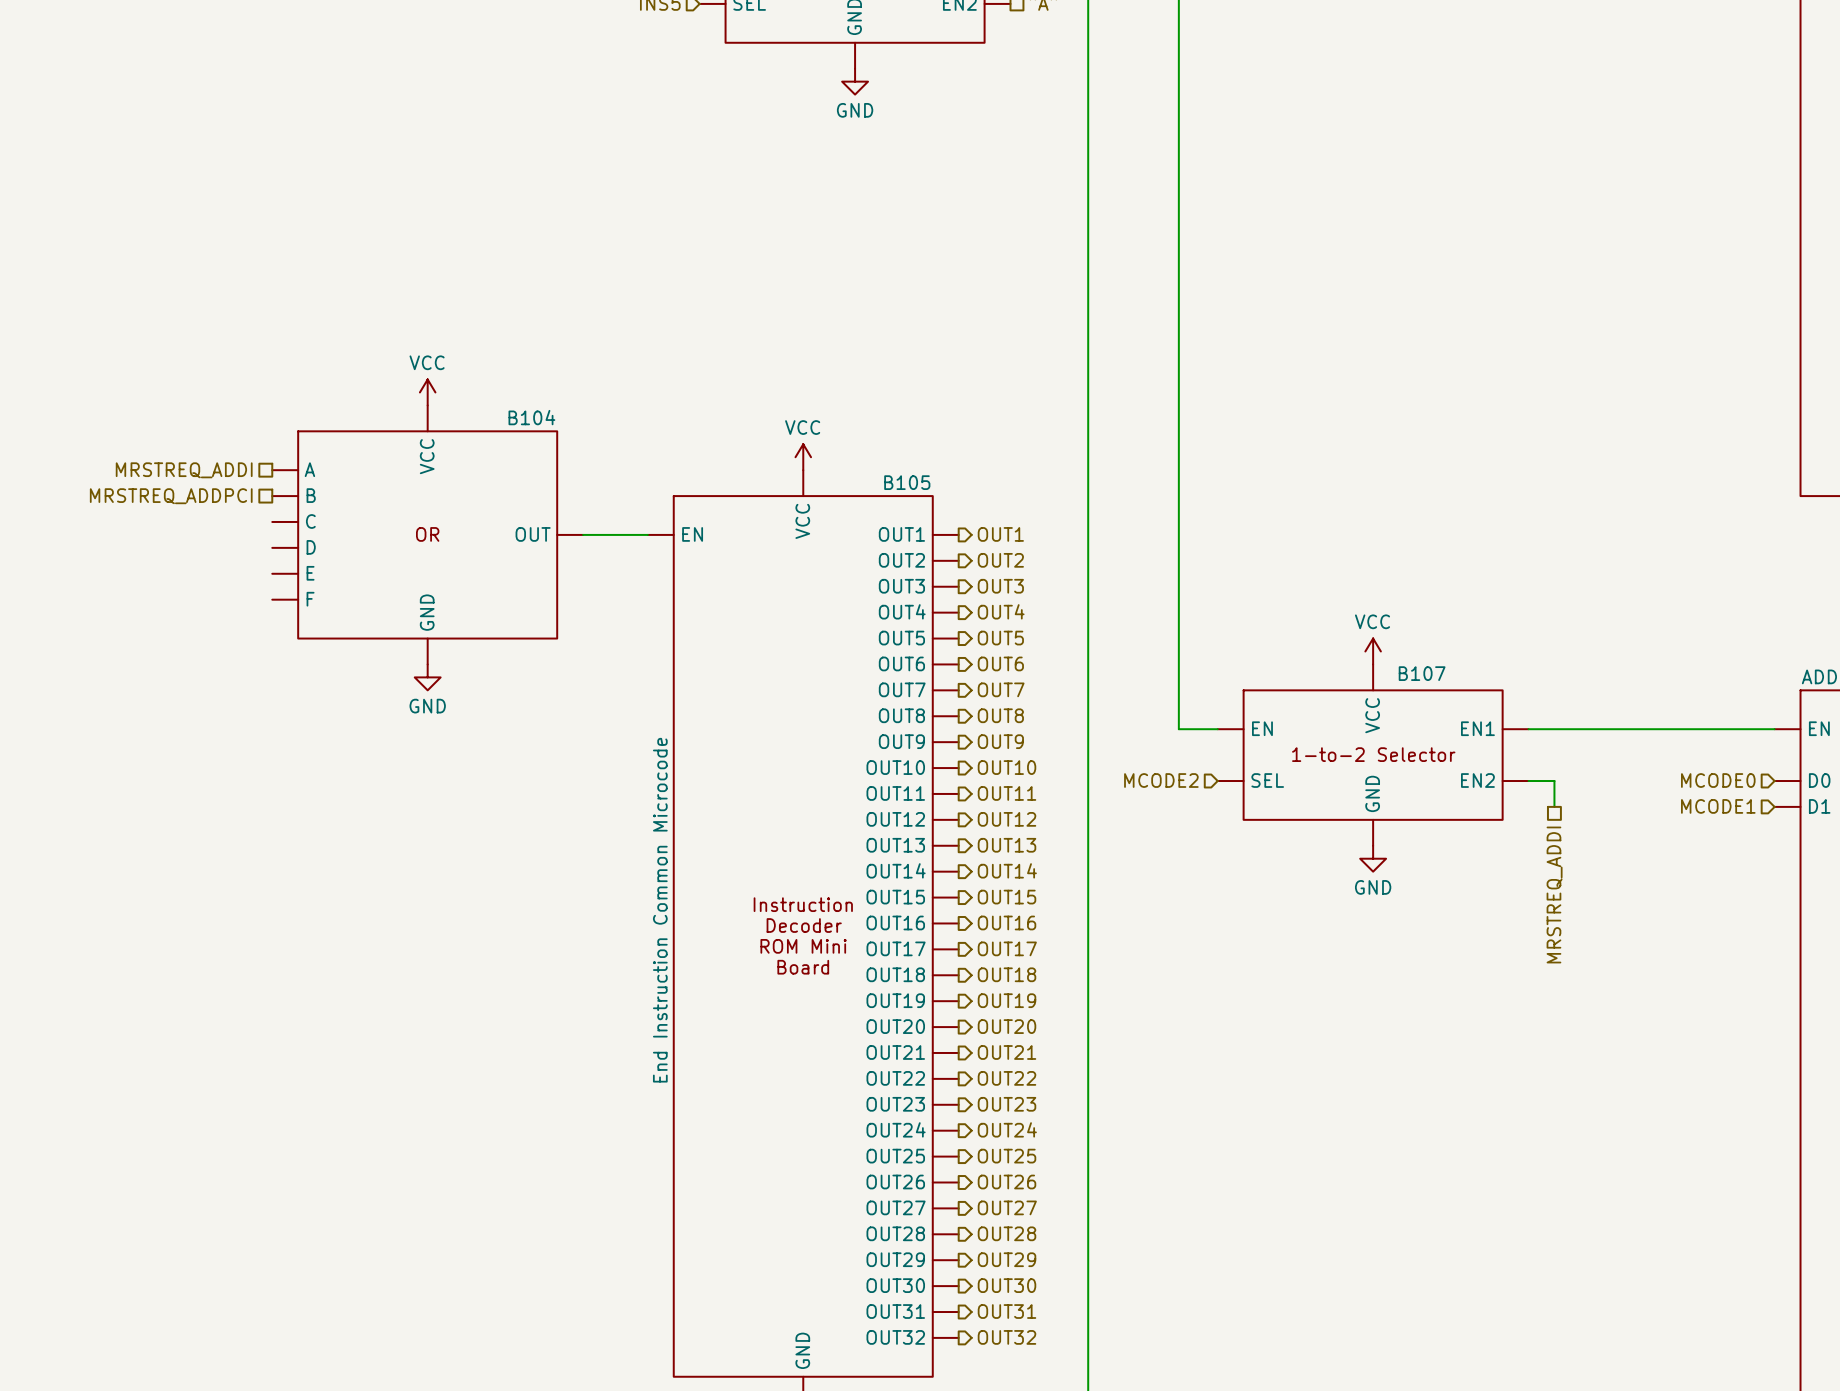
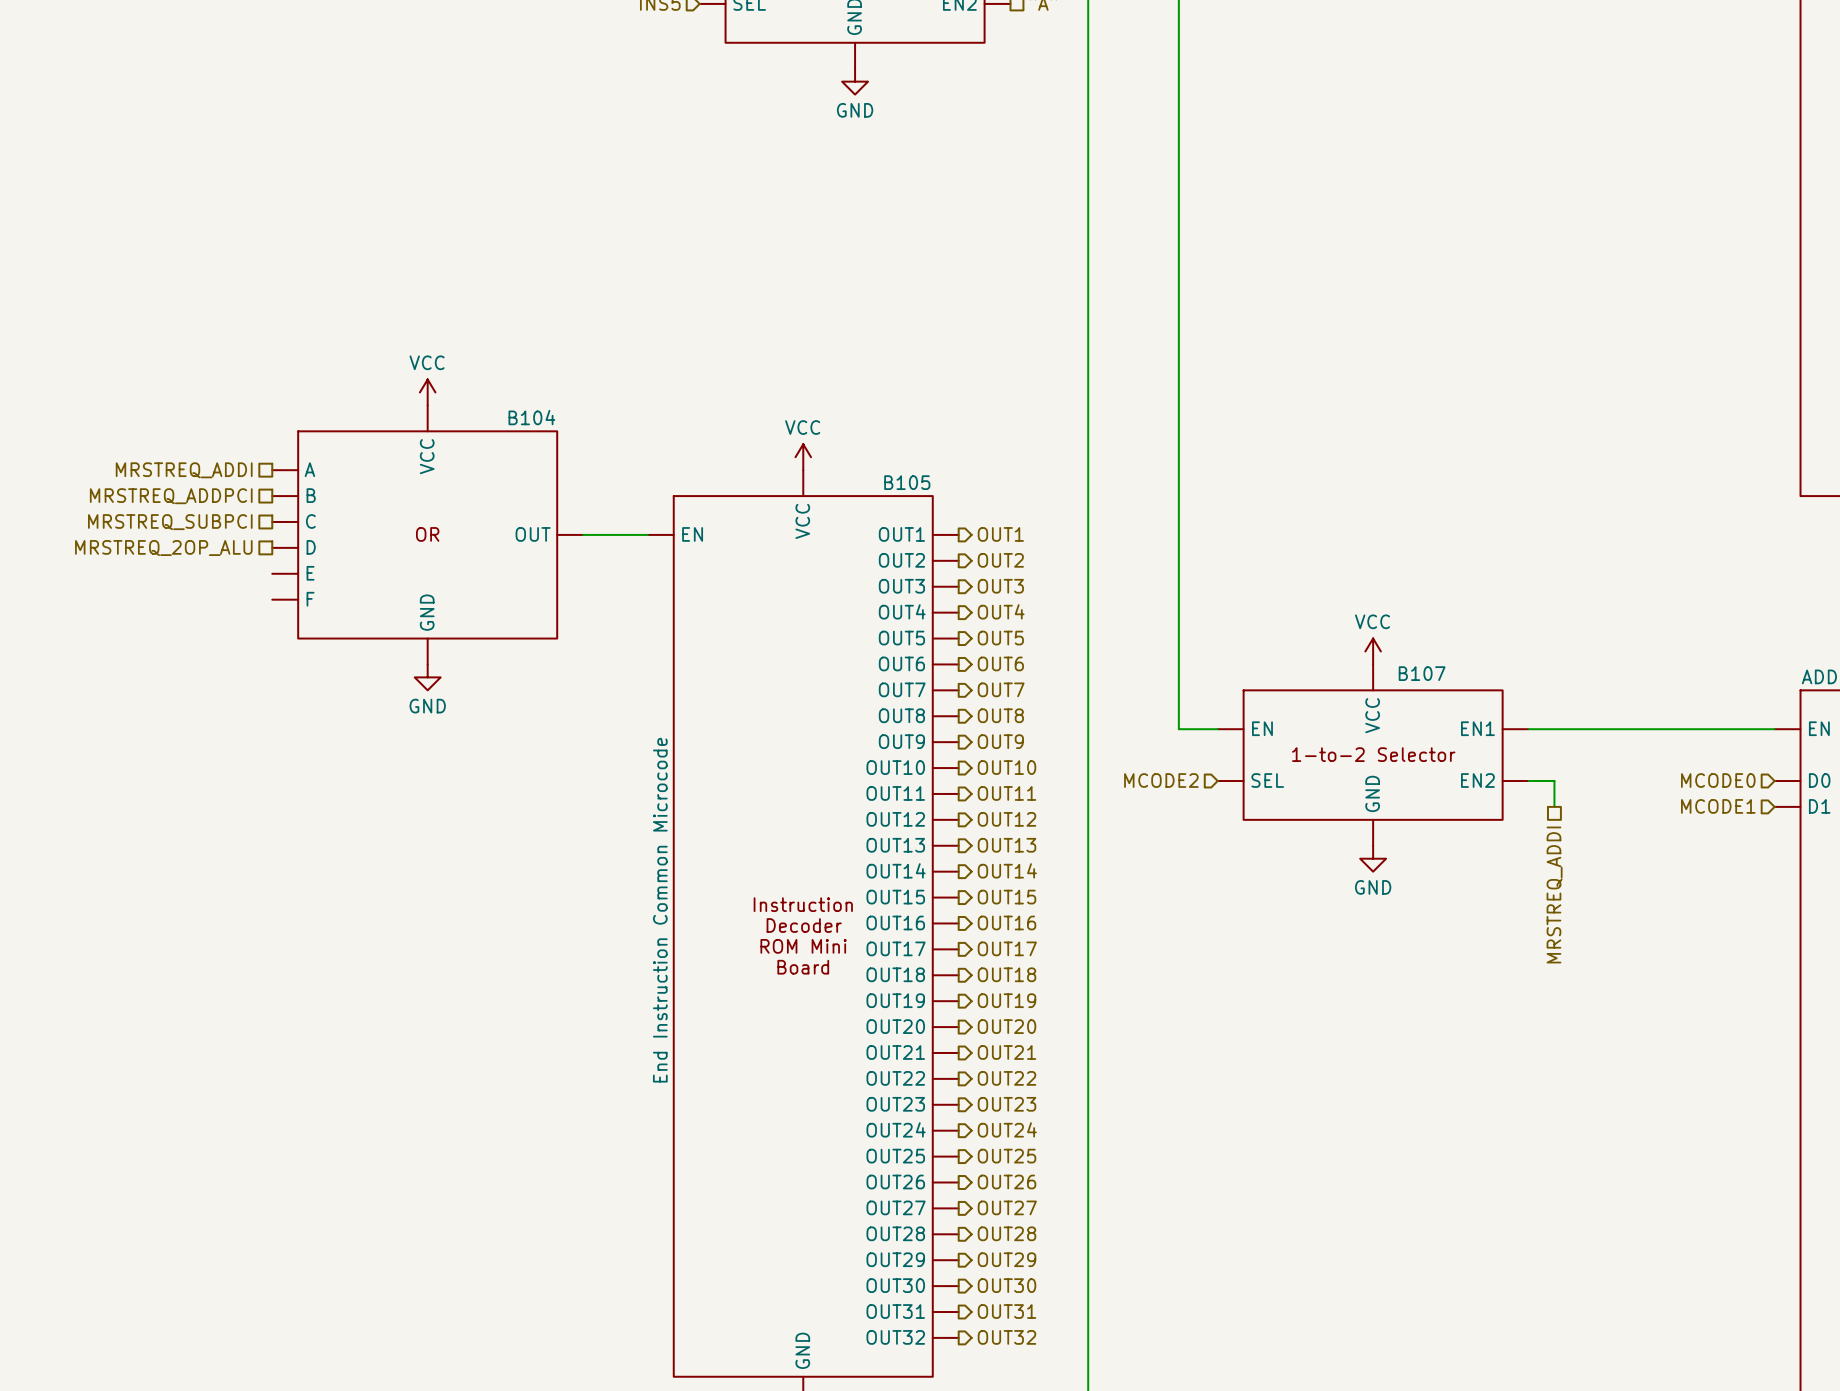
hierarchical label: none -> MRSTREQ_SUBPCI (170, 522)
hierarchical label: none -> MRSTREQ_2OP_ALU (163, 548)

